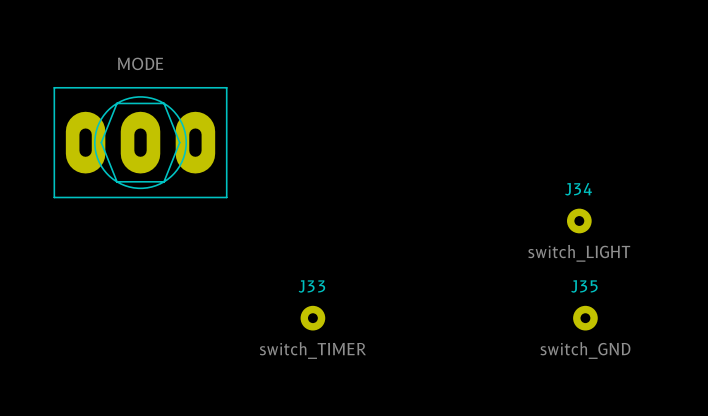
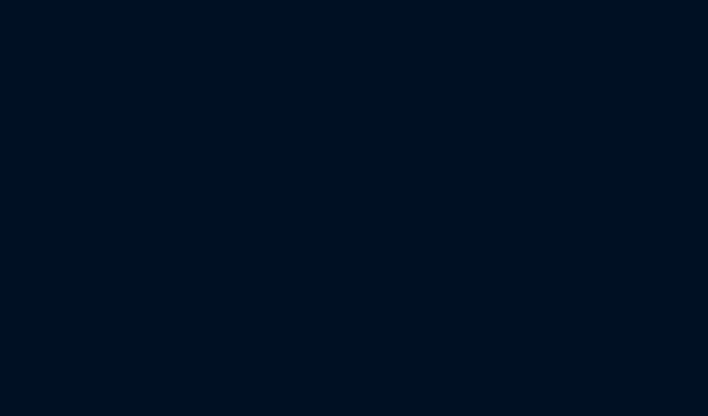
part: MODE (140, 142) -> none
J34: switch_LIGHT (579, 220) -> none
J33: switch_TIMER (312, 318) -> none
J35: switch_GND (585, 318) -> none

